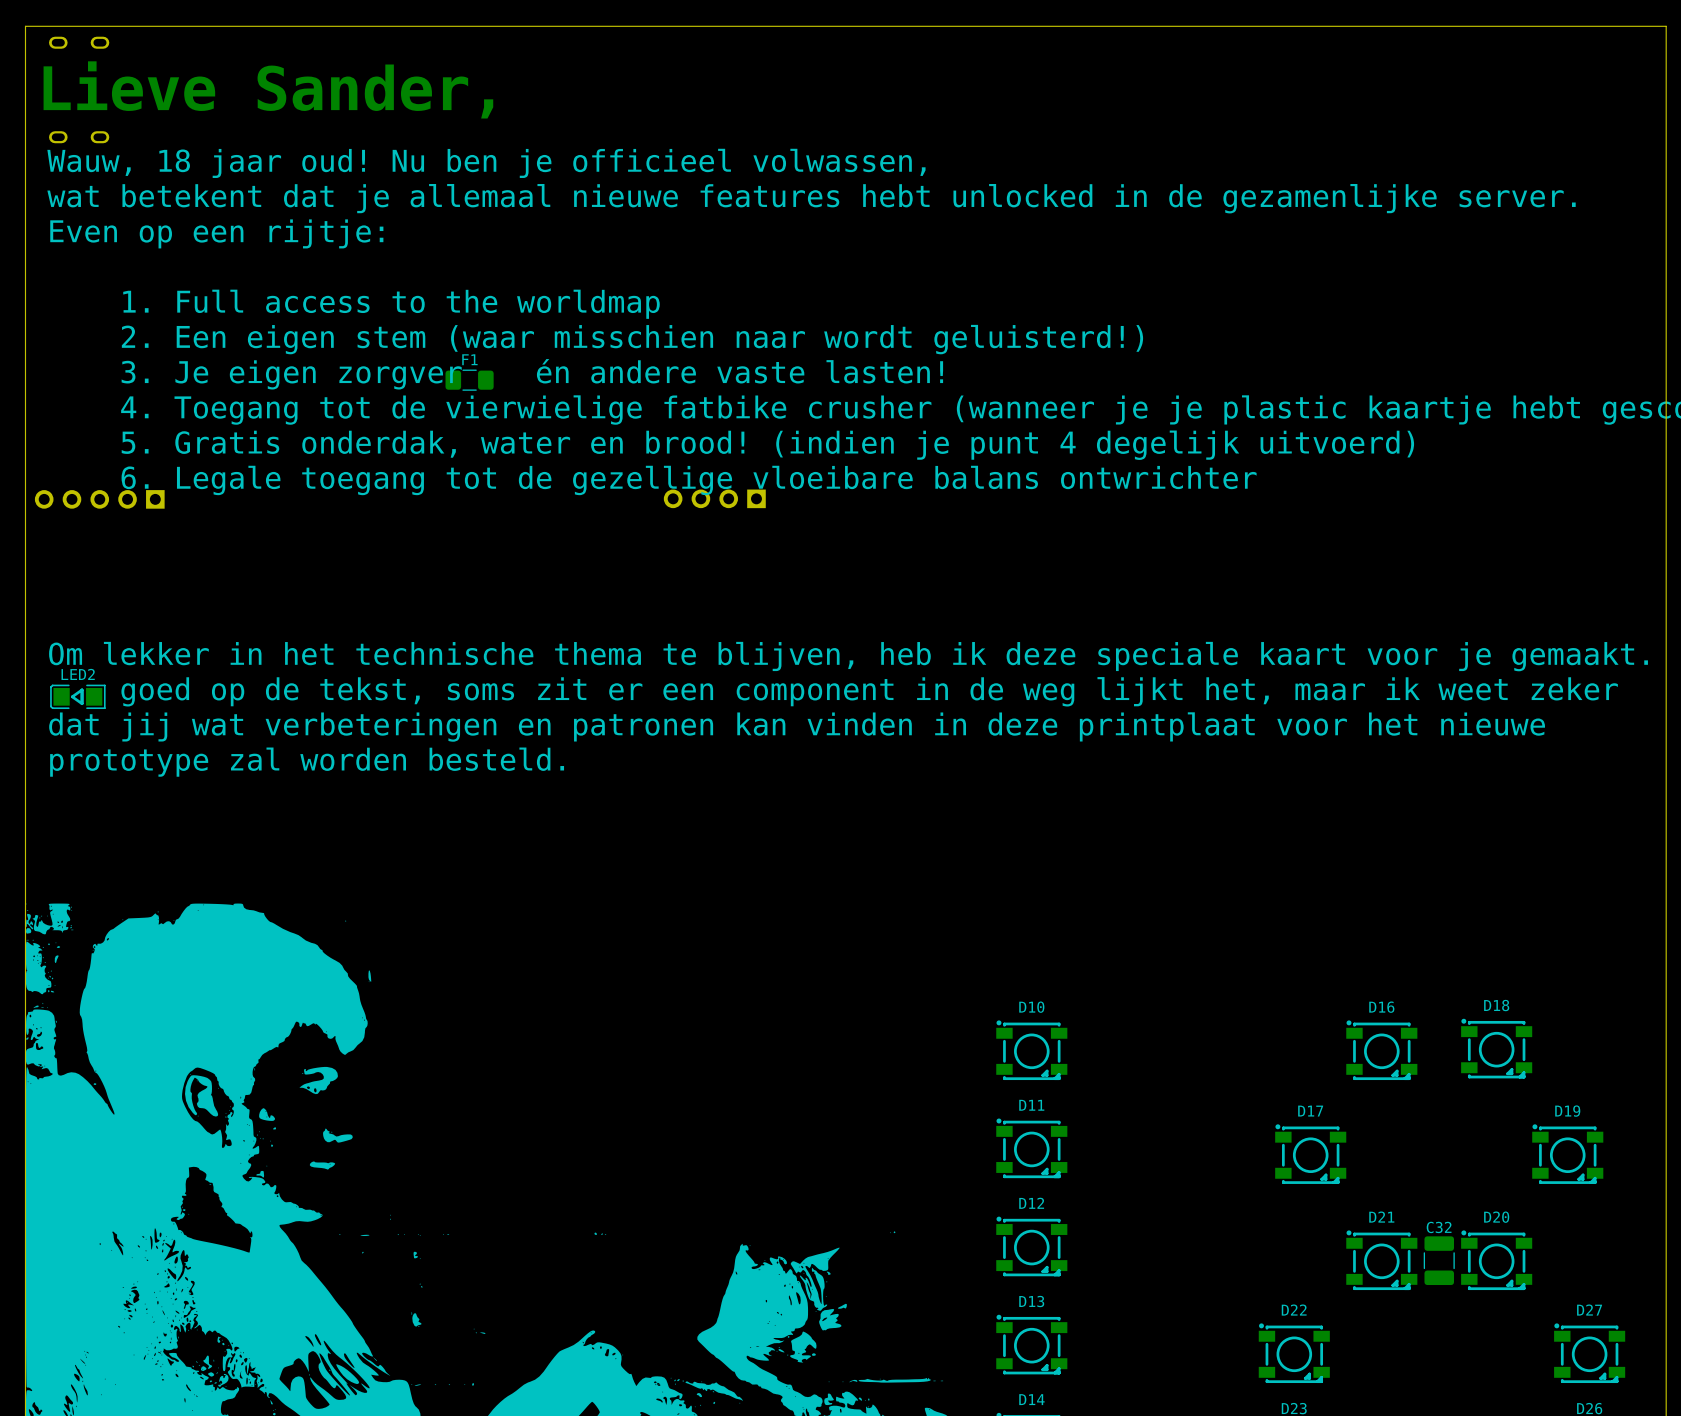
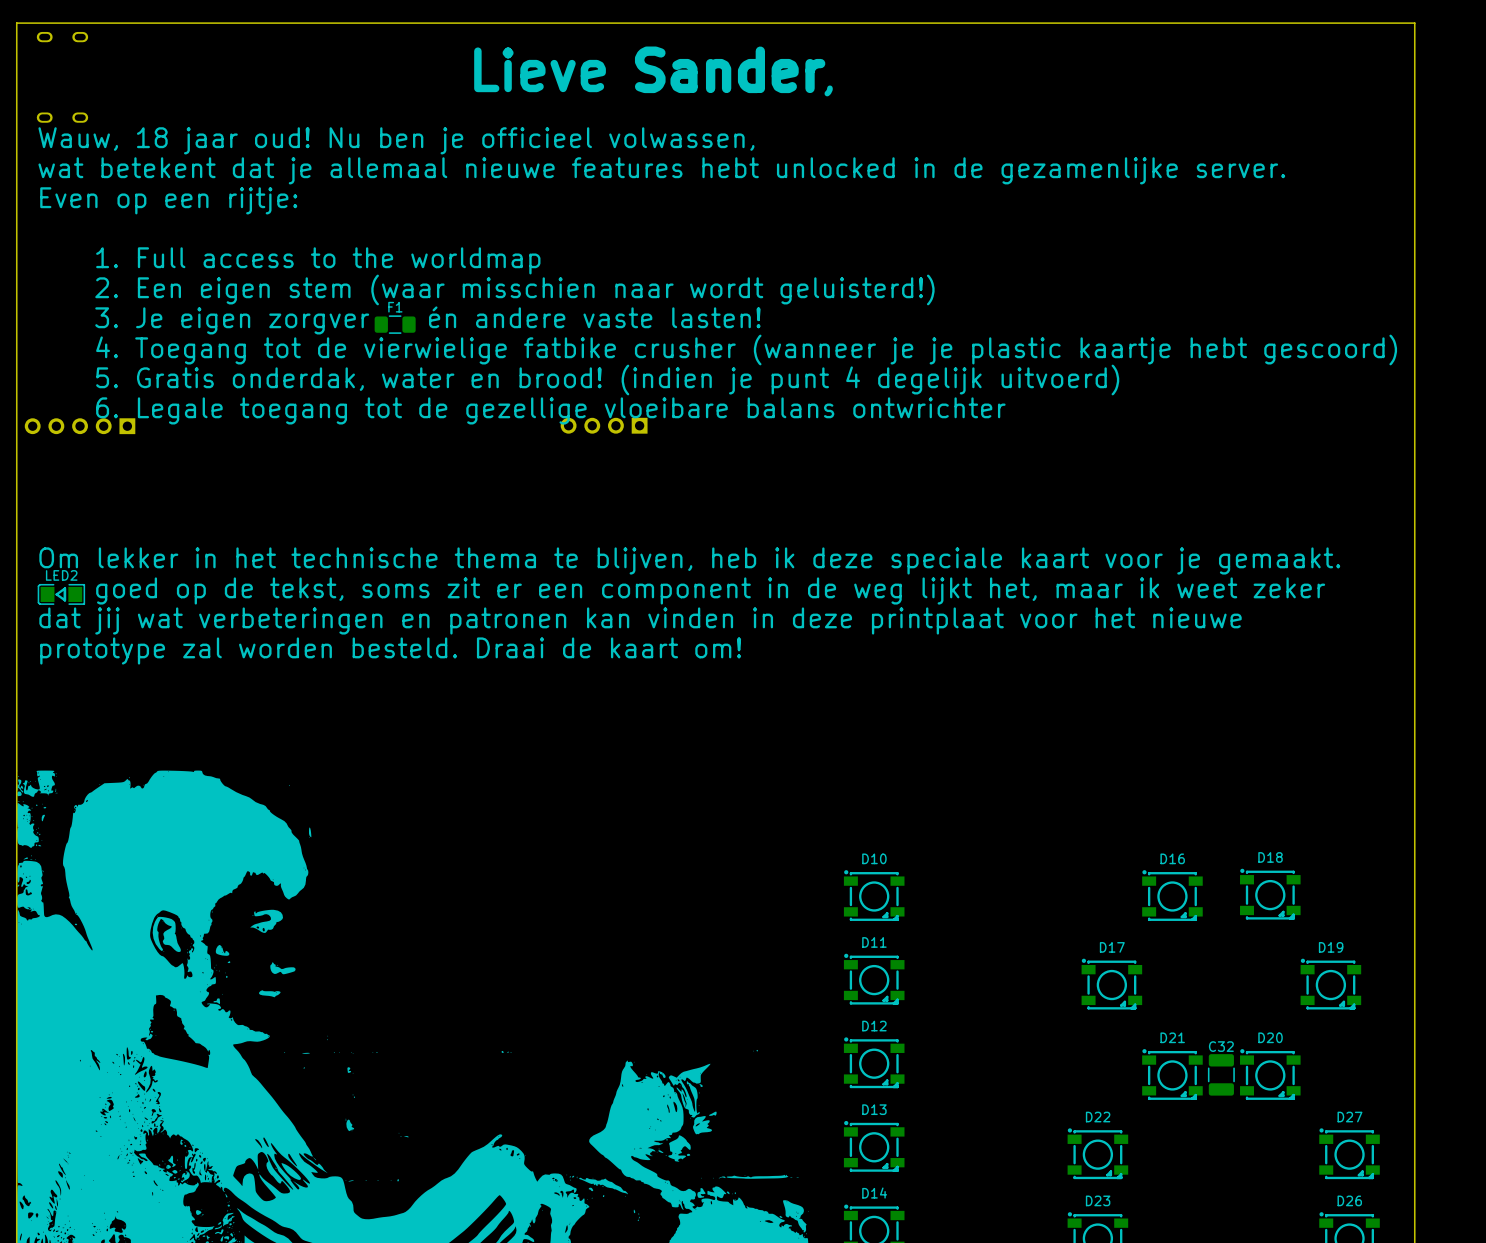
text: none -> Lieve (540, 69)
text: none -> Sander (730, 69)
text: Lieve Sander, (268, 89) -> none
text: none -> , (828, 90)
text: prototype zal worden besteld. (307, 762) -> prototype zal worden besteld. Draai de kaart om! (390, 650)

